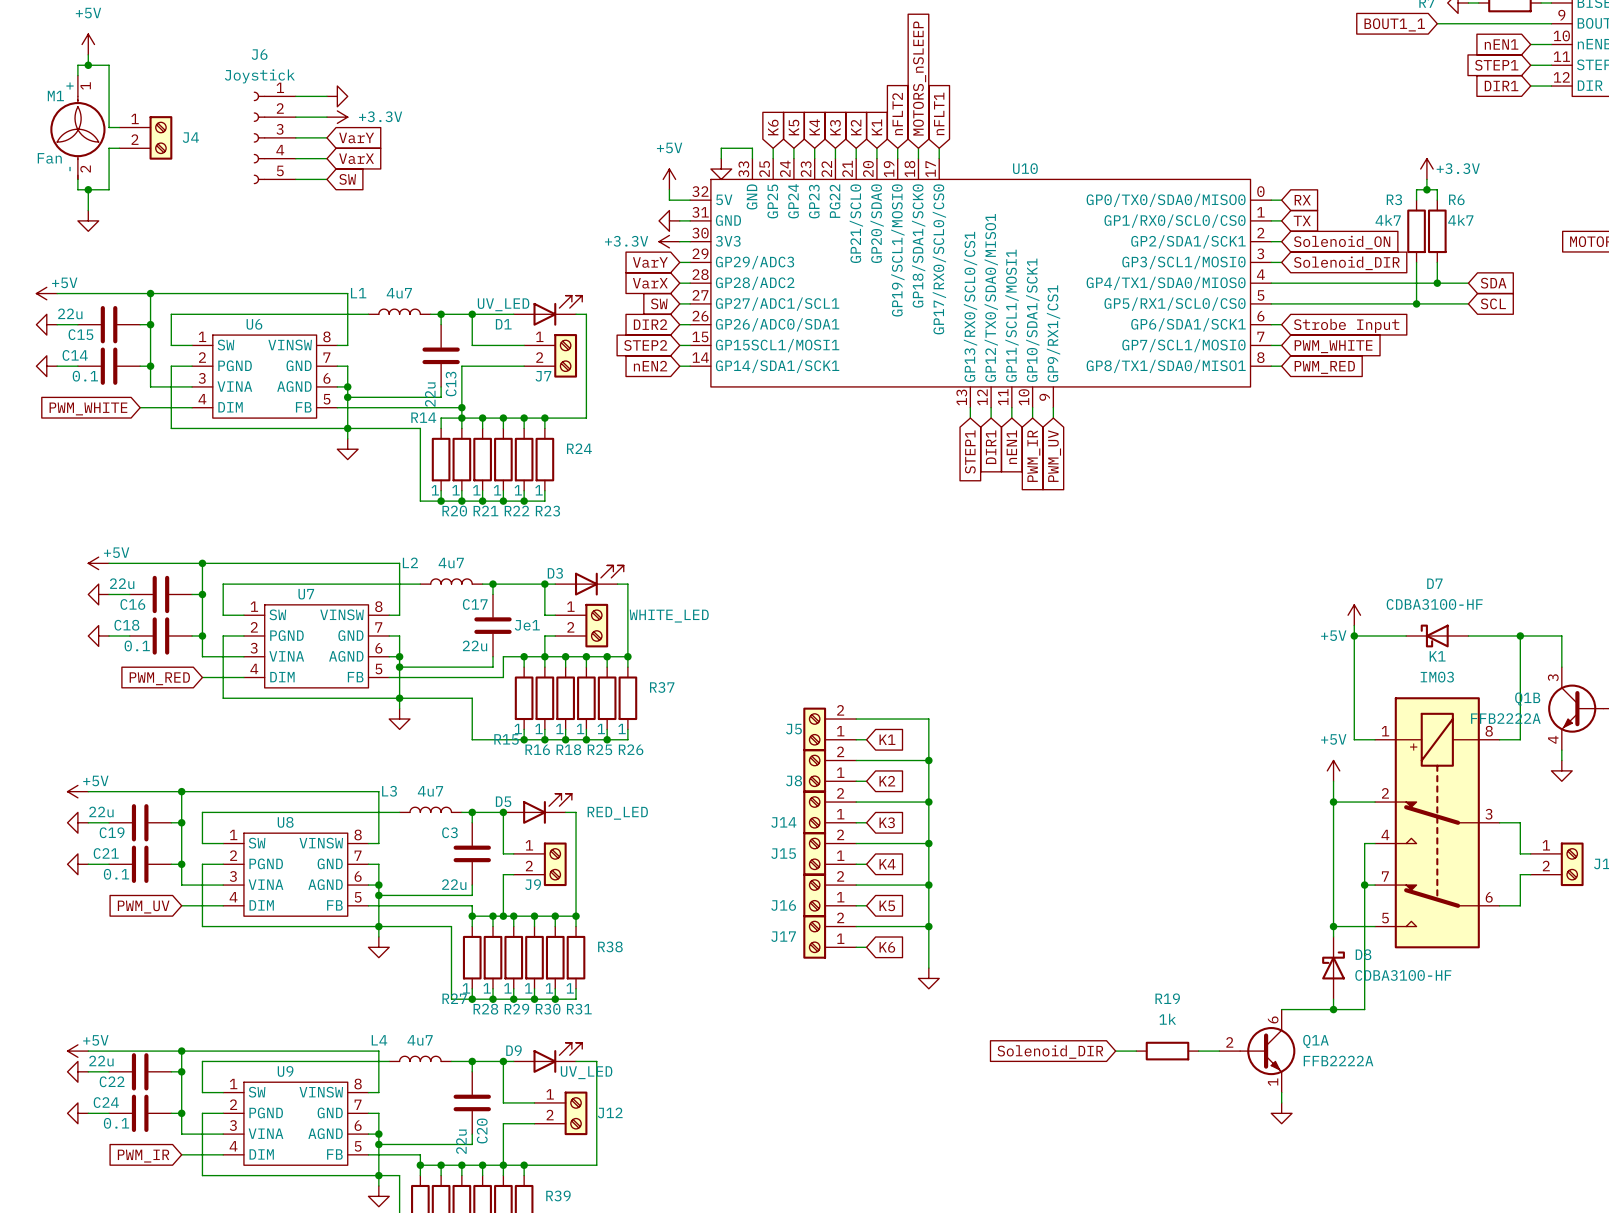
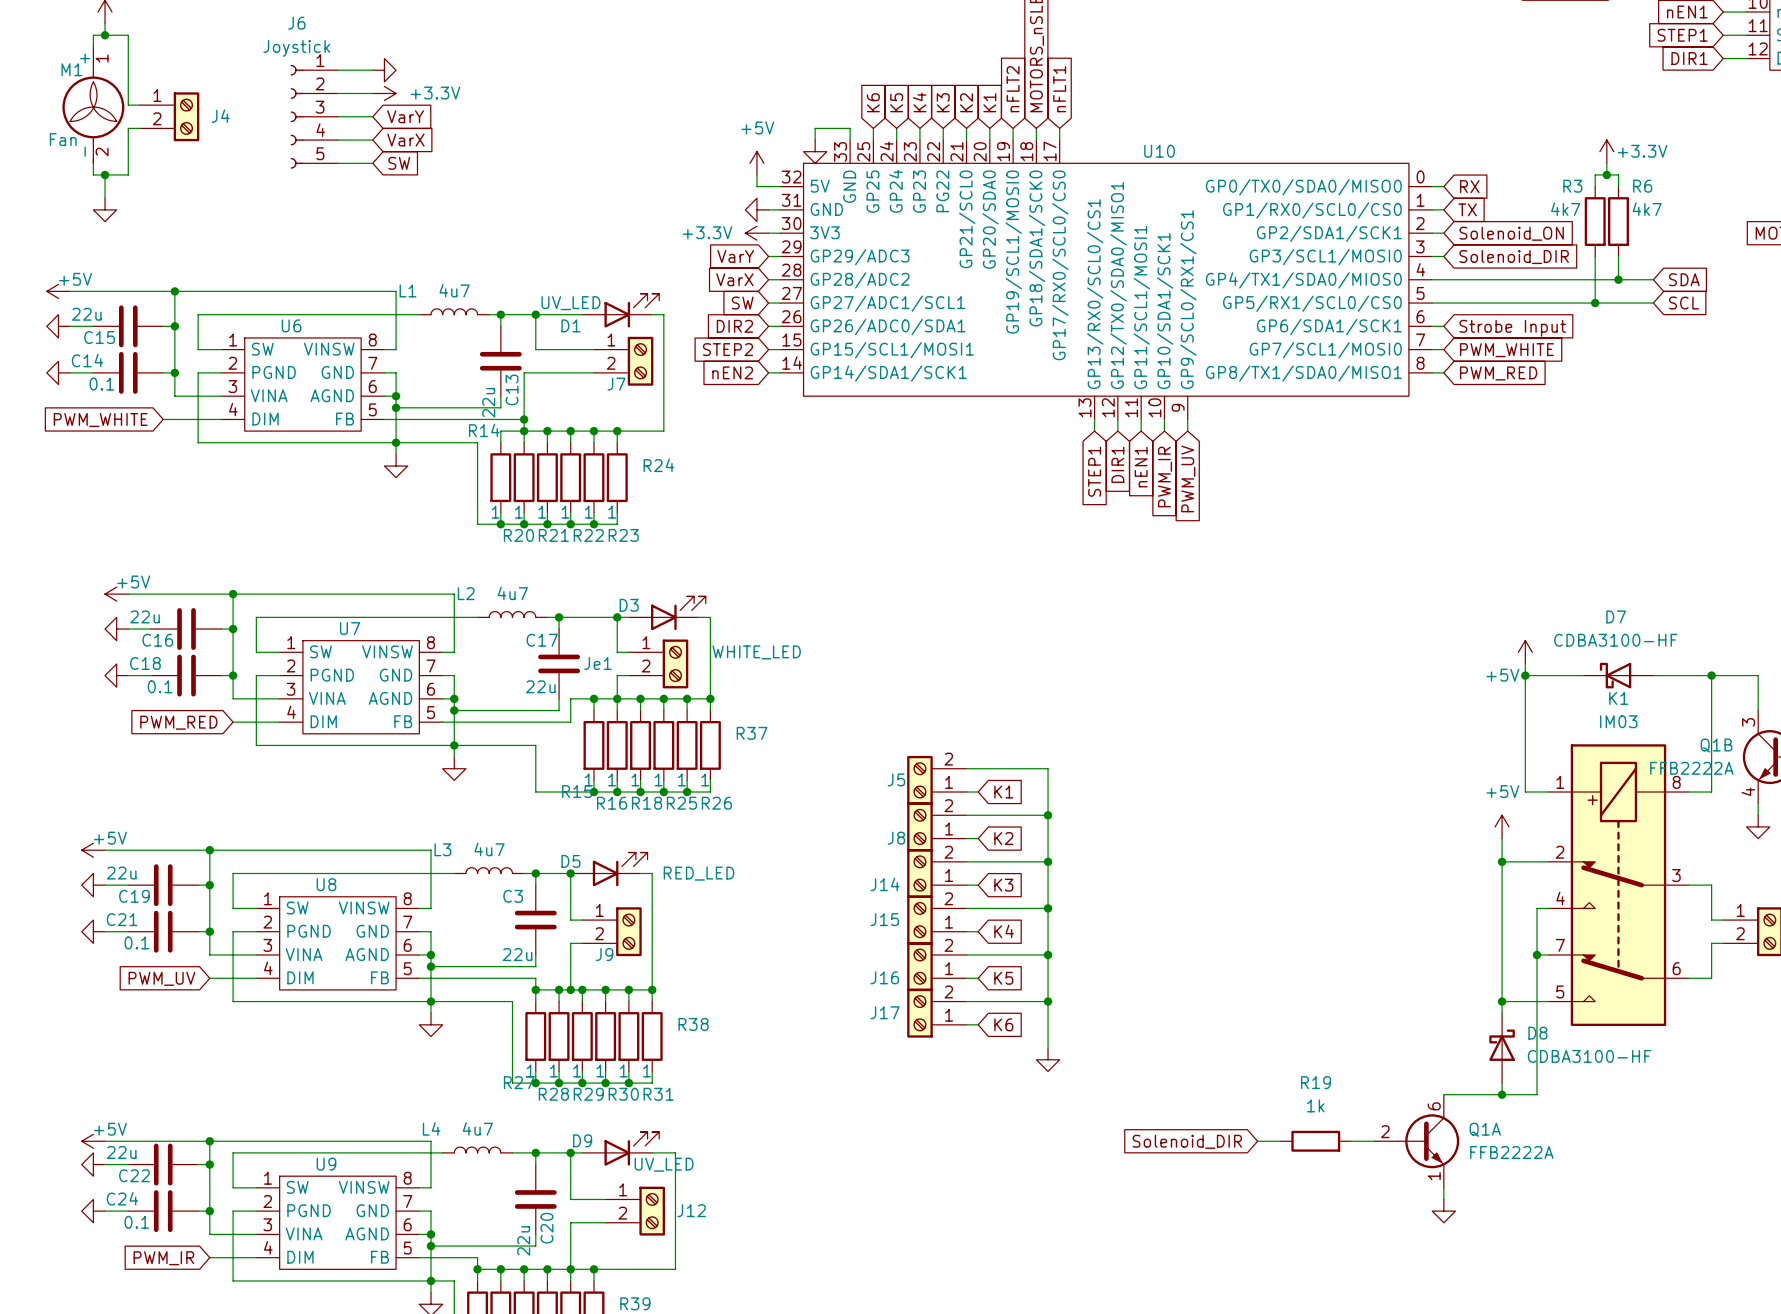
U10 pin name: GP9/RX1/CS1 (1053, 333) -> GP9/SCL0/RX1/CS1 (1188, 299)
U10 pin name: GP15SCL1/MOSI1 (777, 345) -> GP15/SCL1/MOSI1 (892, 350)

